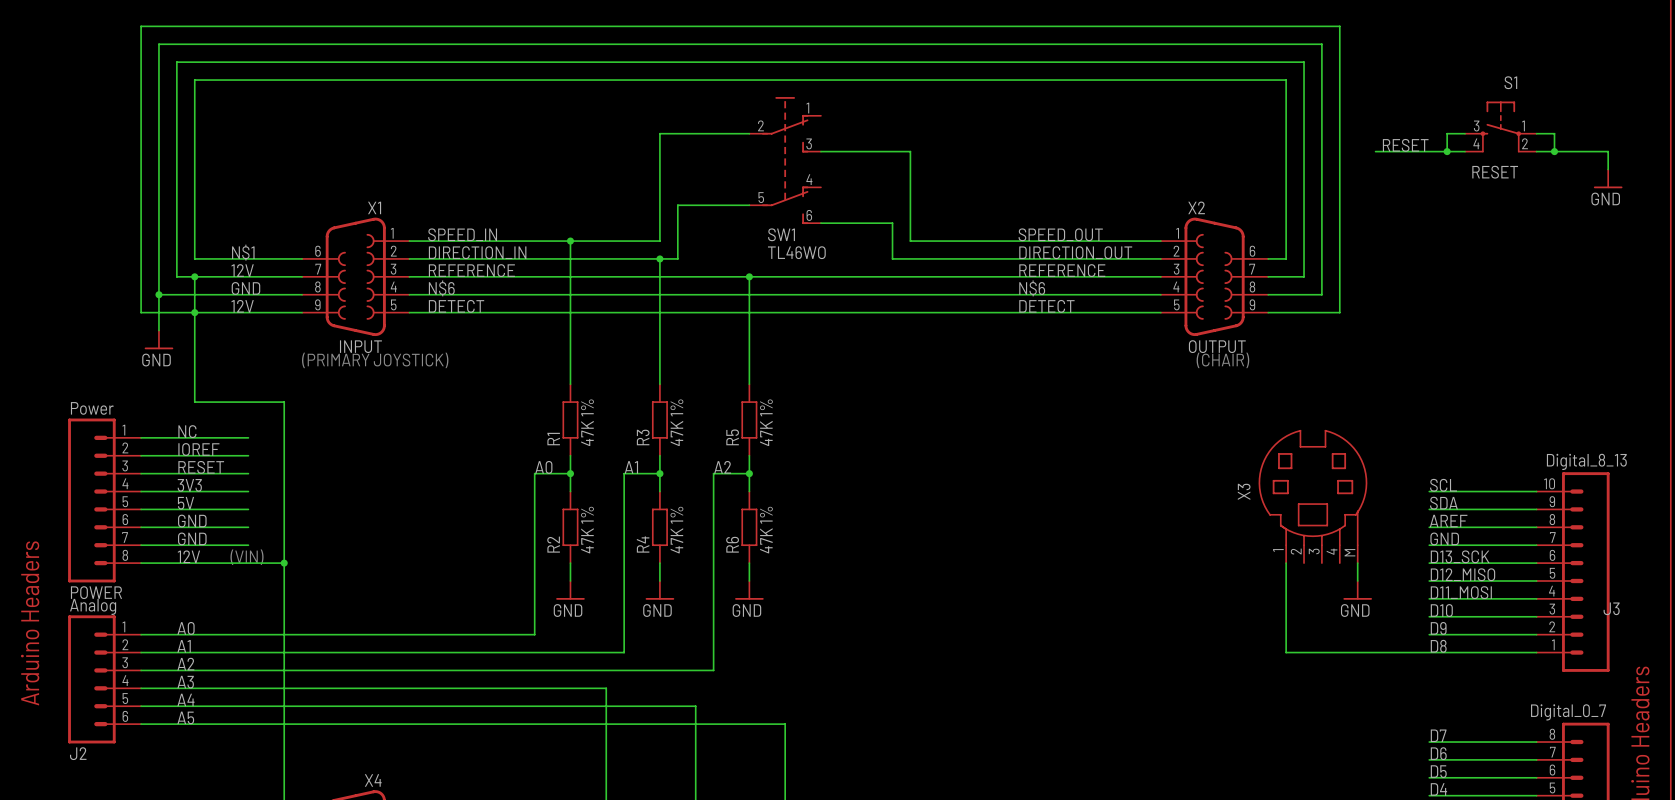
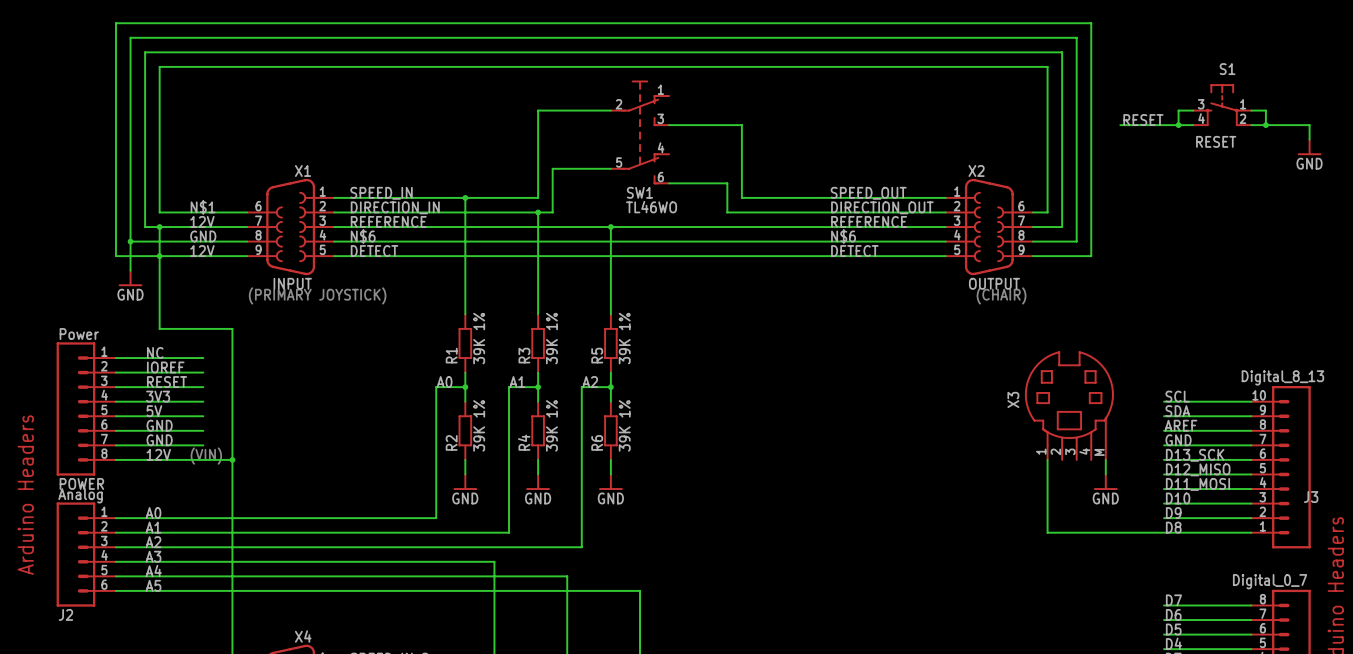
R1 value: 47K 1% (587, 422) -> 39K 1% (479, 338)
R3 value: 47K 1% (676, 422) -> 39K 1% (551, 338)
R5 value: 47K 1% (766, 422) -> 39K 1% (624, 338)
R2 value: 47K 1% (587, 530) -> 39K 1% (479, 425)
R4 value: 47K 1% (676, 530) -> 39K 1% (551, 425)
R6 value: 47K 1% (766, 530) -> 39K 1% (624, 425)

